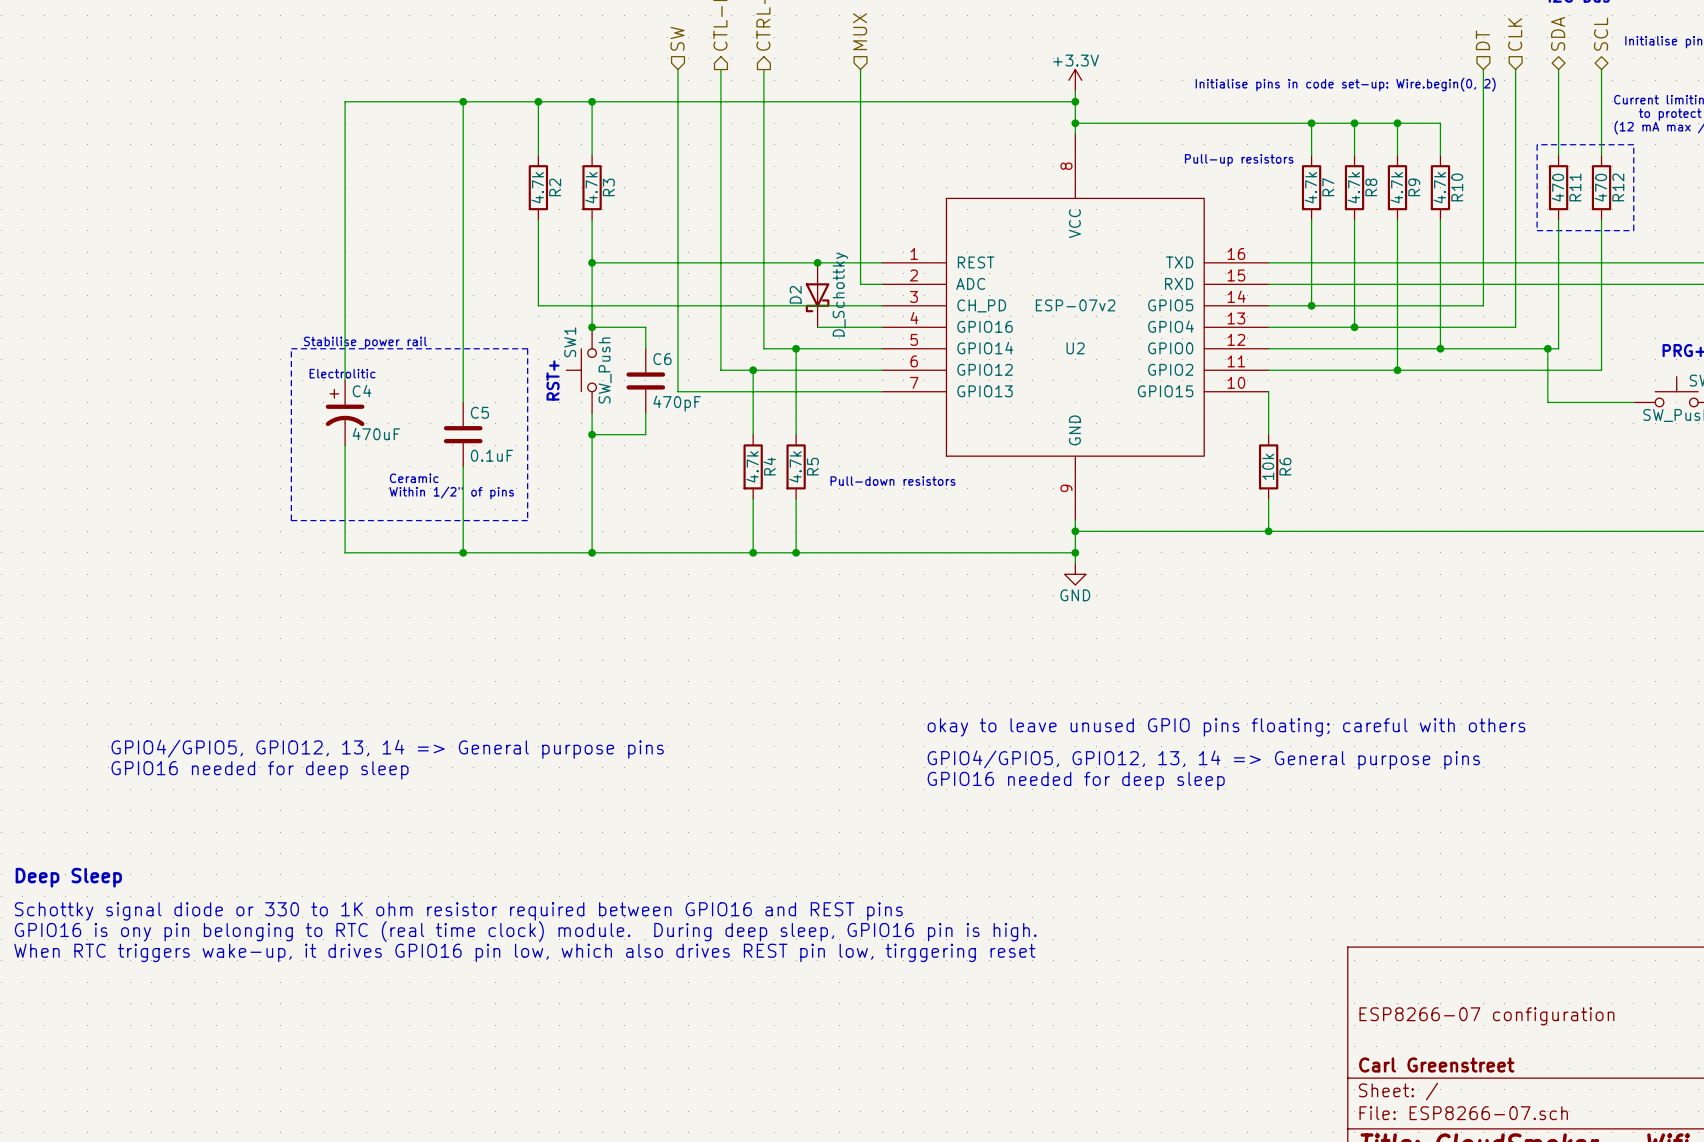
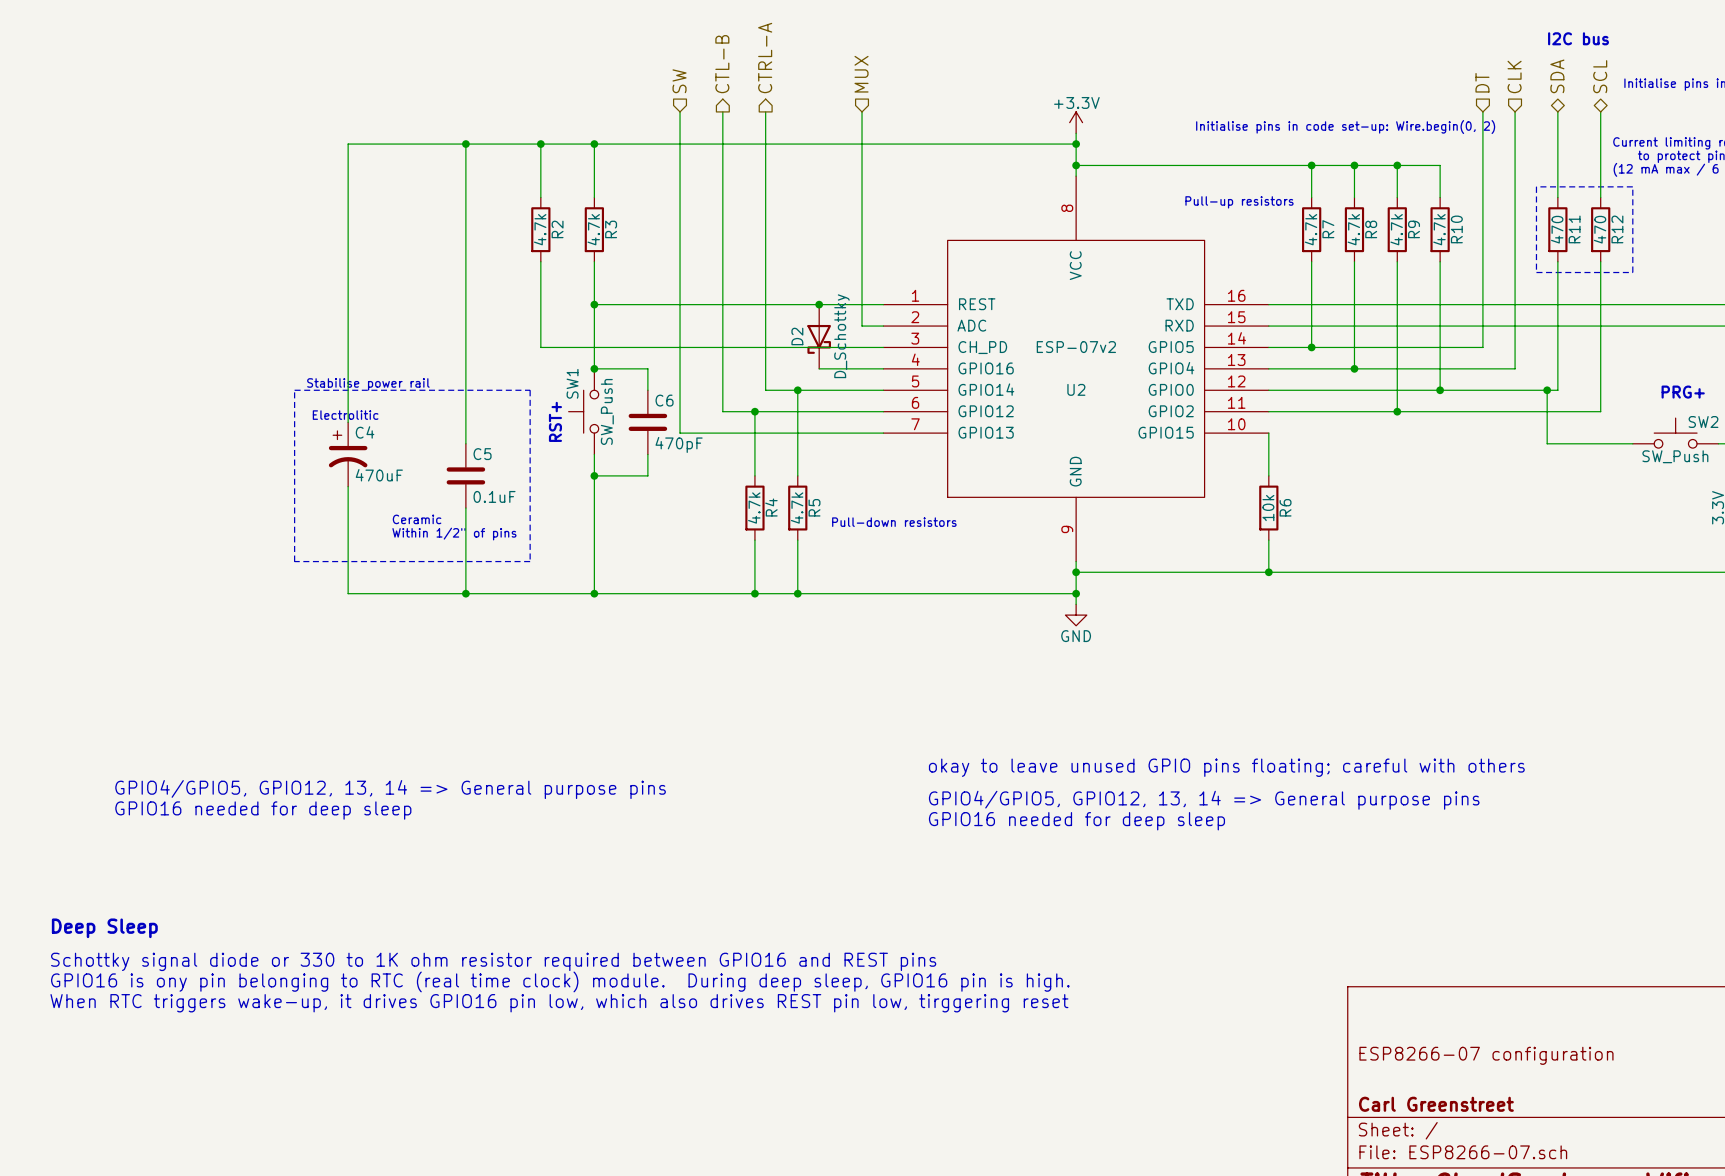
text position: Deep Sleep (68, 877) -> Deep Sleep (104, 928)
text position: Schottky signal diode or 330 to 1K ohm resistor required between GPIO16 and REST pins (458, 911) -> Schottky signal diode or 330 to 1K ohm resistor required between GPIO16 and REST pins (493, 961)
text position: GPIO16 is ony pin belonging to RTC (real time clock) module. During deep sleep, GPIO16 pin is high. (525, 931) -> GPIO16 is ony pin belonging to RTC (real time clock) module. During deep sleep, GPIO16 pin is high. (560, 981)
text position: When RTC triggers wake-up, it drives GPIO16 pin low, which also drives REST pin low, tirggering reset (524, 952) -> When RTC triggers wake-up, it drives GPIO16 pin low, which also drives REST pin low, tirggering reset (559, 1003)

